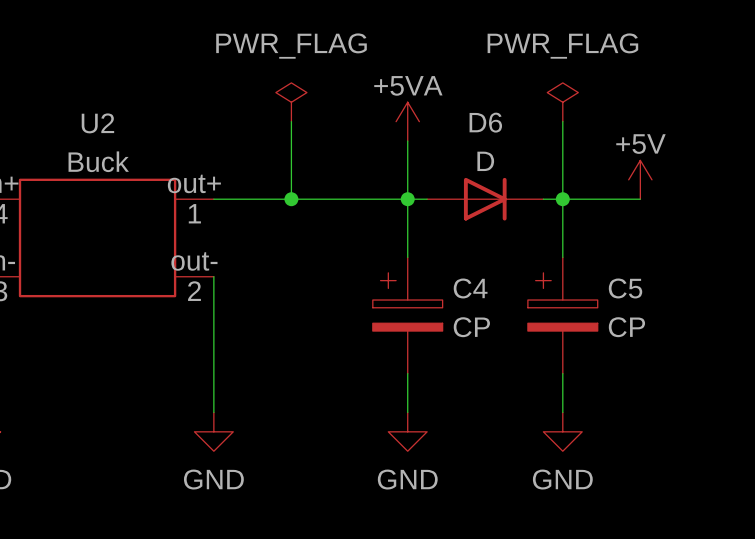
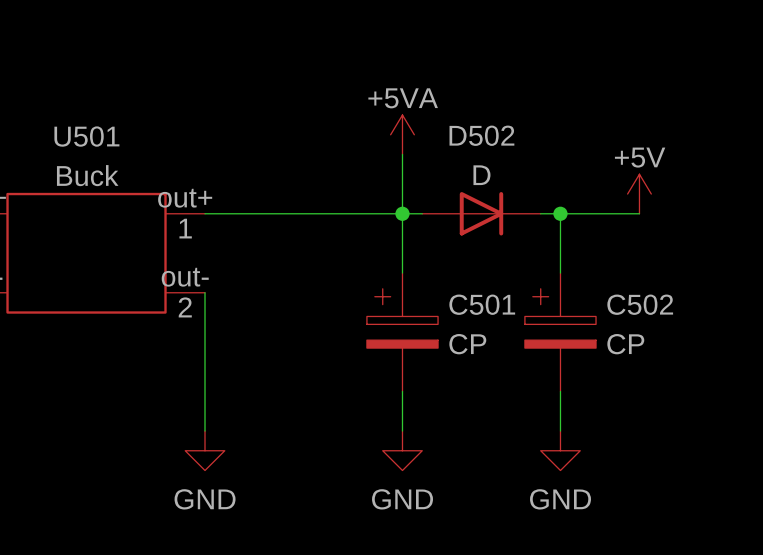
power symbol: PWR_FLAG (291, 102) -> none
power symbol: PWR_FLAG (562, 102) -> none
wire: (291, 121) (291, 199) -> none
wire: (562, 121) (562, 199) -> none
D6 name: D6 (485, 122) -> D502 (481, 135)
U2 name: U2 (97, 123) -> U501 (86, 136)
junction: (291, 199) -> none
C4 name: C4 (470, 288) -> C501 (482, 304)
C5 name: C5 (625, 288) -> C502 (640, 304)

